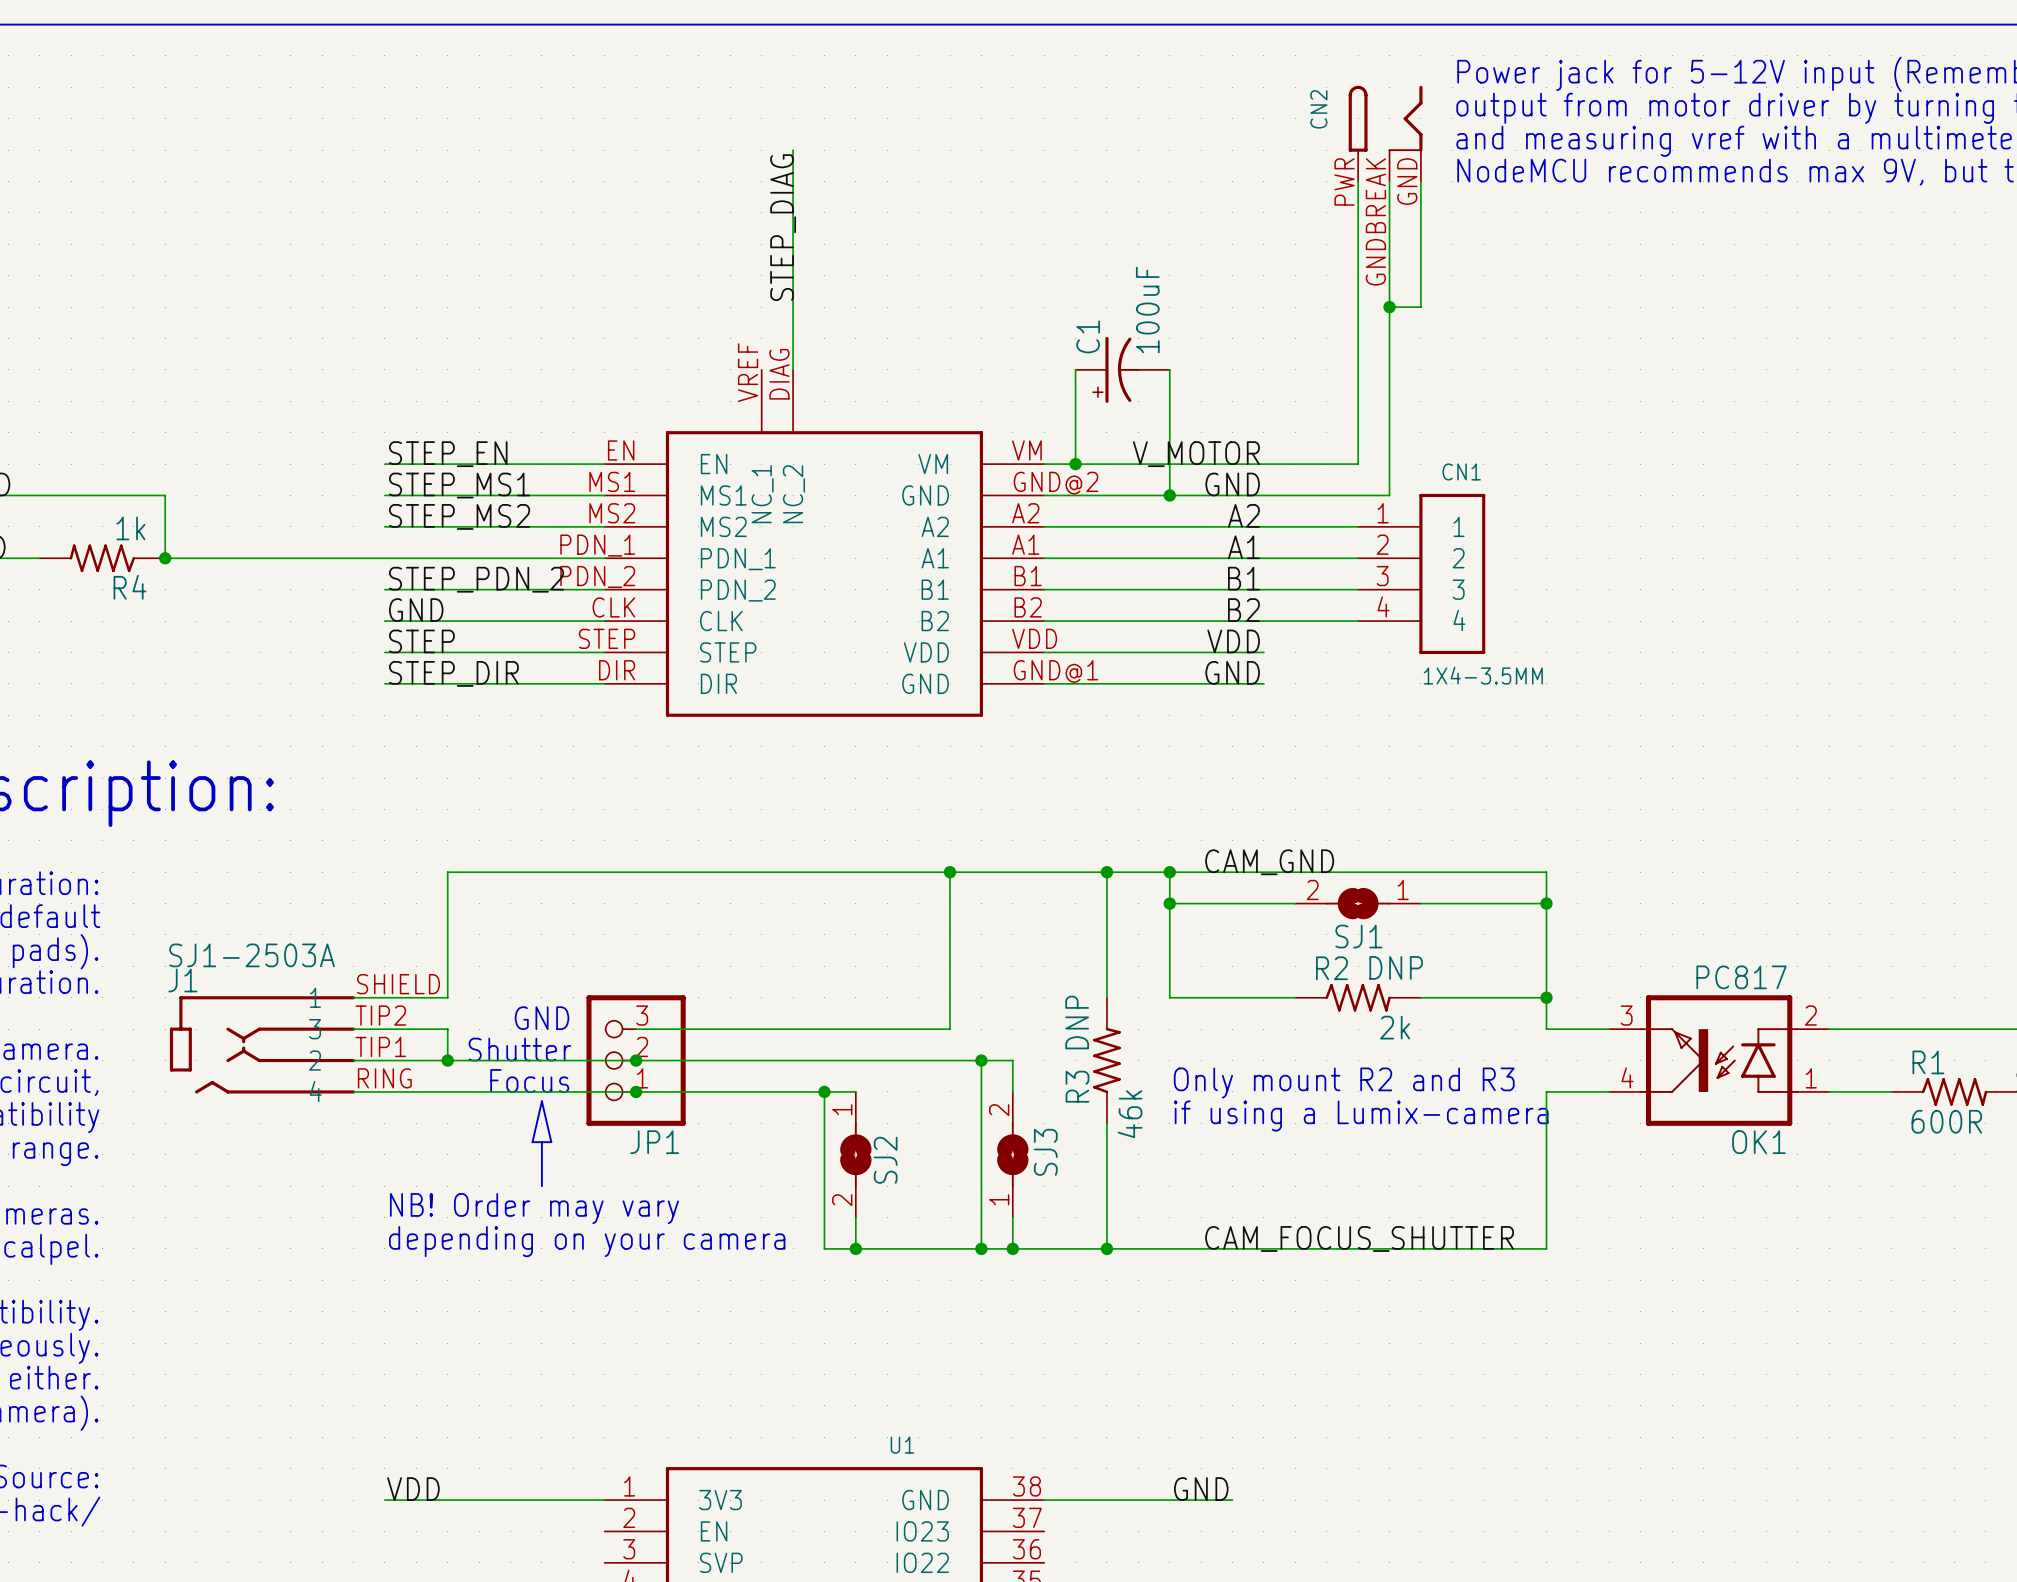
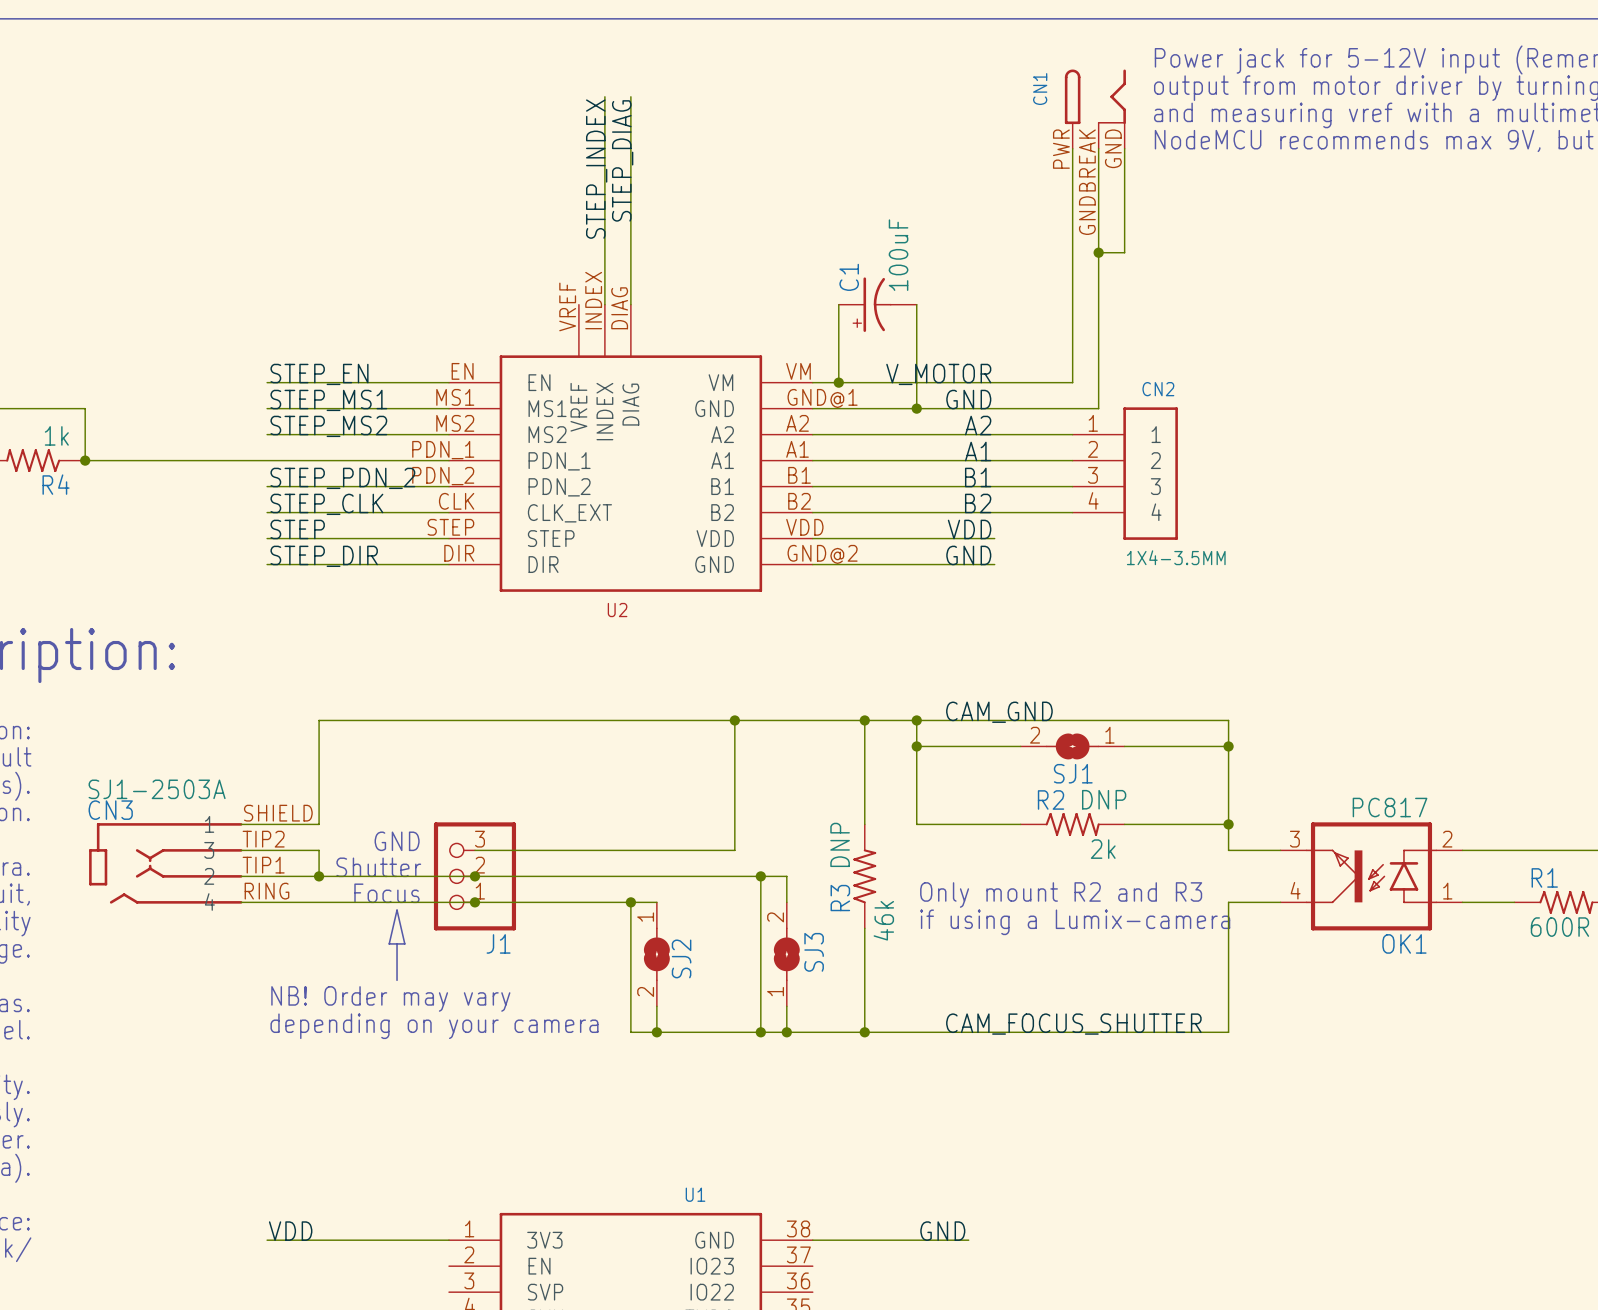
CN2 name: CN2 (1318, 109) -> CN1 (1040, 89)
wire: none -> (604, 96) (604, 122)
wire: none -> (630, 96) (630, 304)
label: none -> STEP_INDEX (596, 169)
label position: STEP_DIAG (783, 227) -> STEP_DIAG (622, 160)
CN1 name: CN1 (1461, 471) -> CN2 (1158, 389)
part: (824, 543) -> none
U2: none -> (630, 448)
label: GND (416, 610) -> STEP_CLK (326, 504)
J1 name: J1 (182, 980) -> CN3 (110, 810)
JP1 name: JP1 (654, 1142) -> J1 (498, 943)

